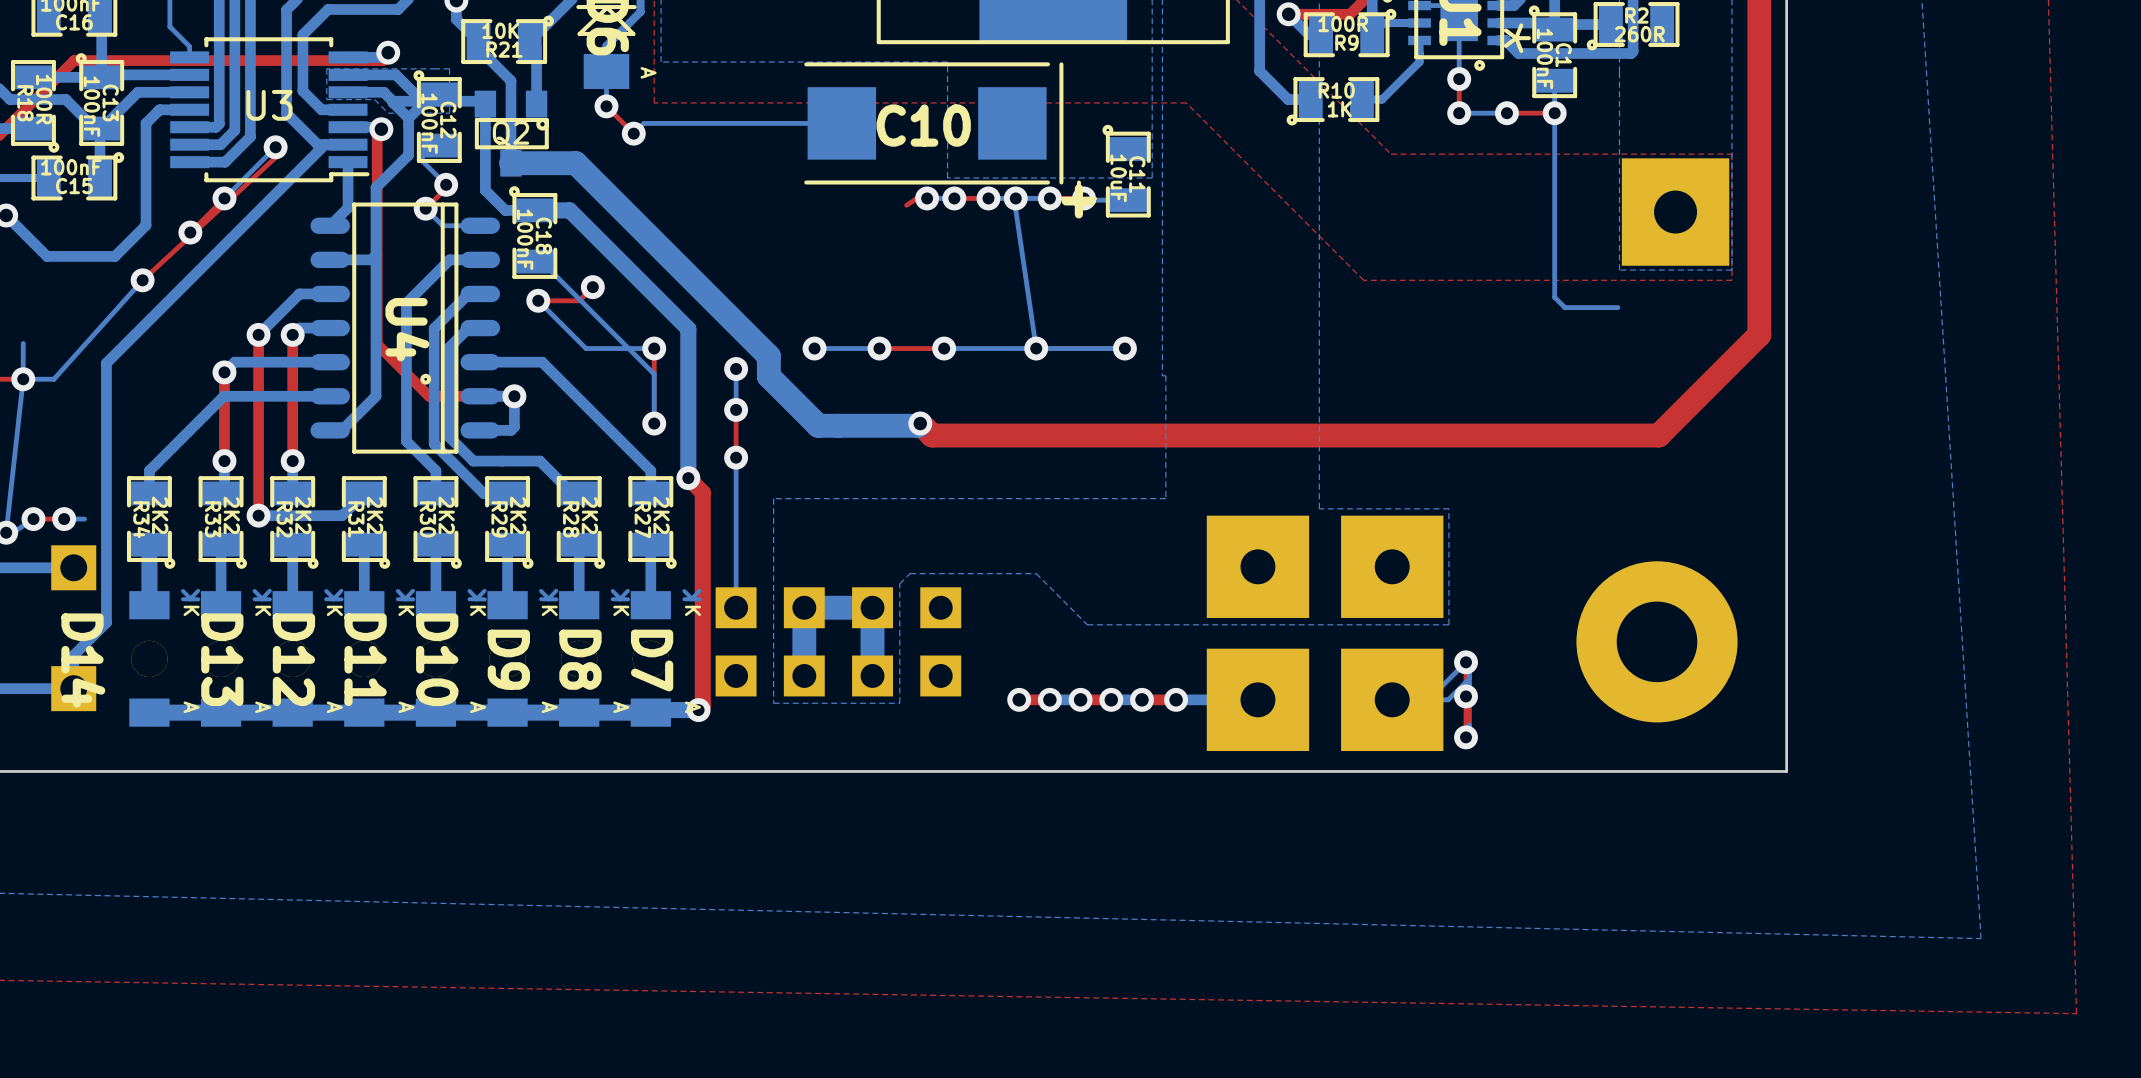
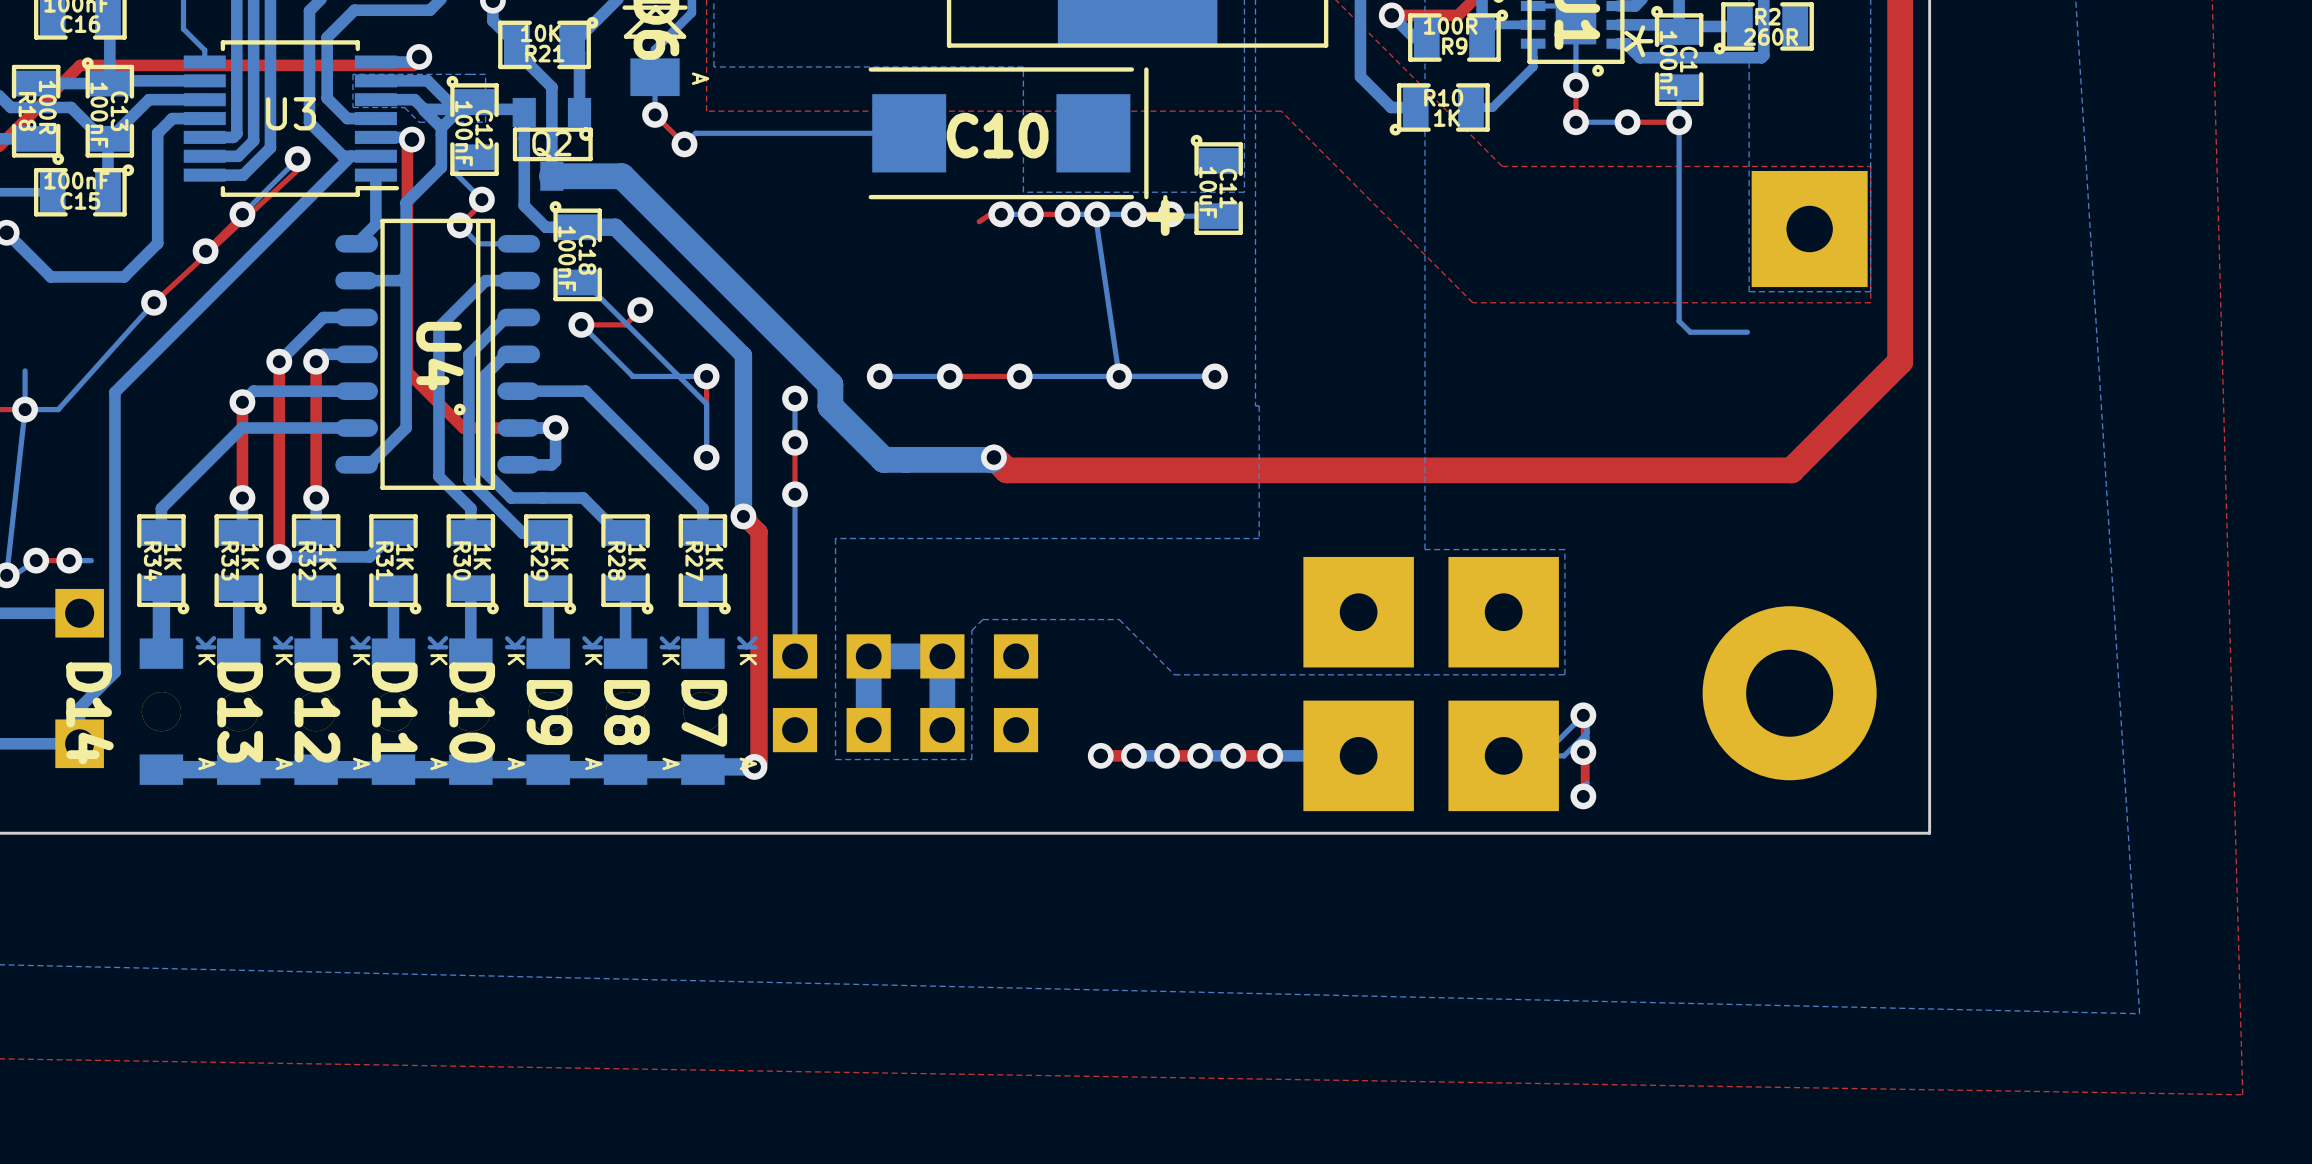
R34 value: 2K2 (160, 515) -> 1K (172, 556)
R33 value: 2K2 (231, 515) -> 1K (250, 556)
R32 value: 2K2 (303, 515) -> 1K (327, 556)
R31 value: 2K2 (375, 515) -> 1K (405, 556)
R30 value: 2K2 (446, 515) -> 1K (482, 556)
R29 value: 2K2 (518, 515) -> 1K (559, 556)
R28 value: 2K2 (589, 515) -> 1K (637, 556)
R27 value: 2K2 (661, 515) -> 1K (714, 556)

